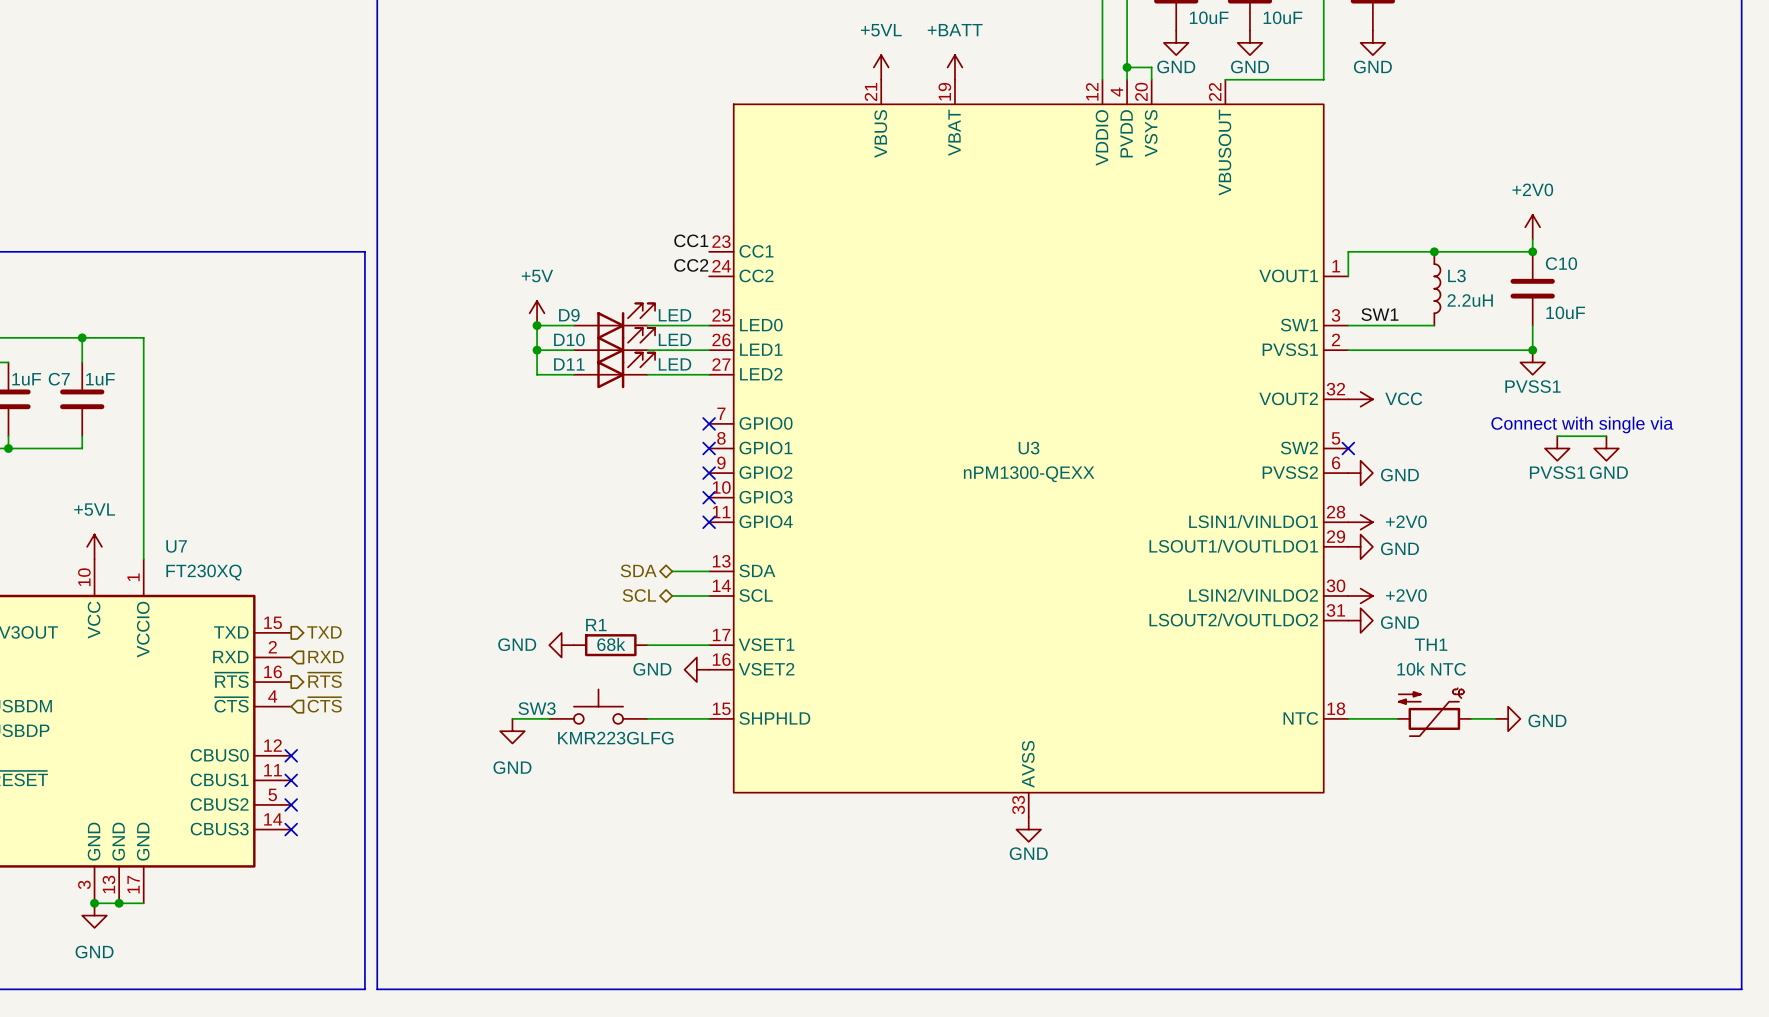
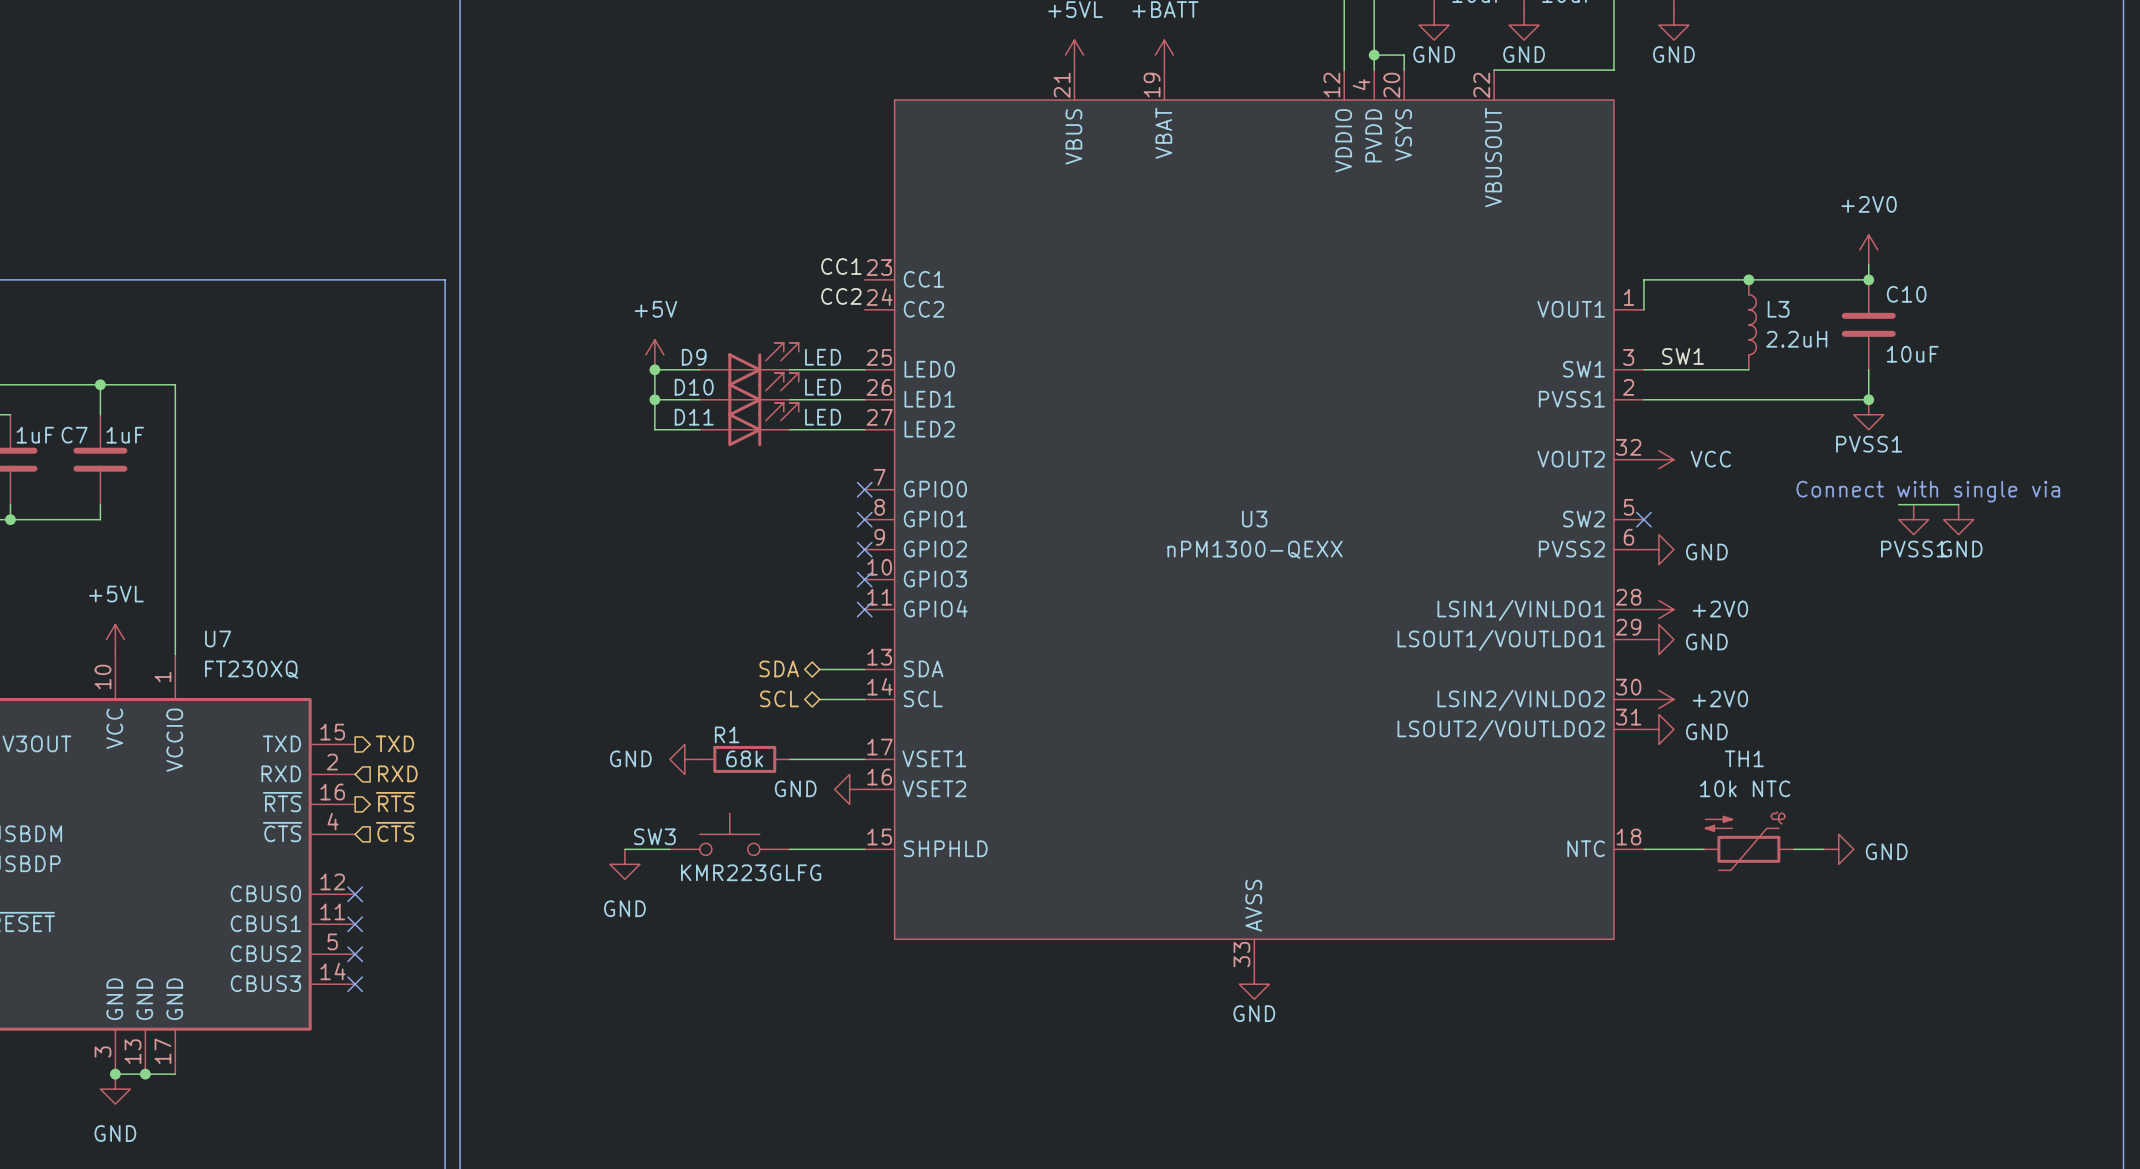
power symbol position: PVSS1 (1557, 448) -> PVSS1 (1913, 519)

